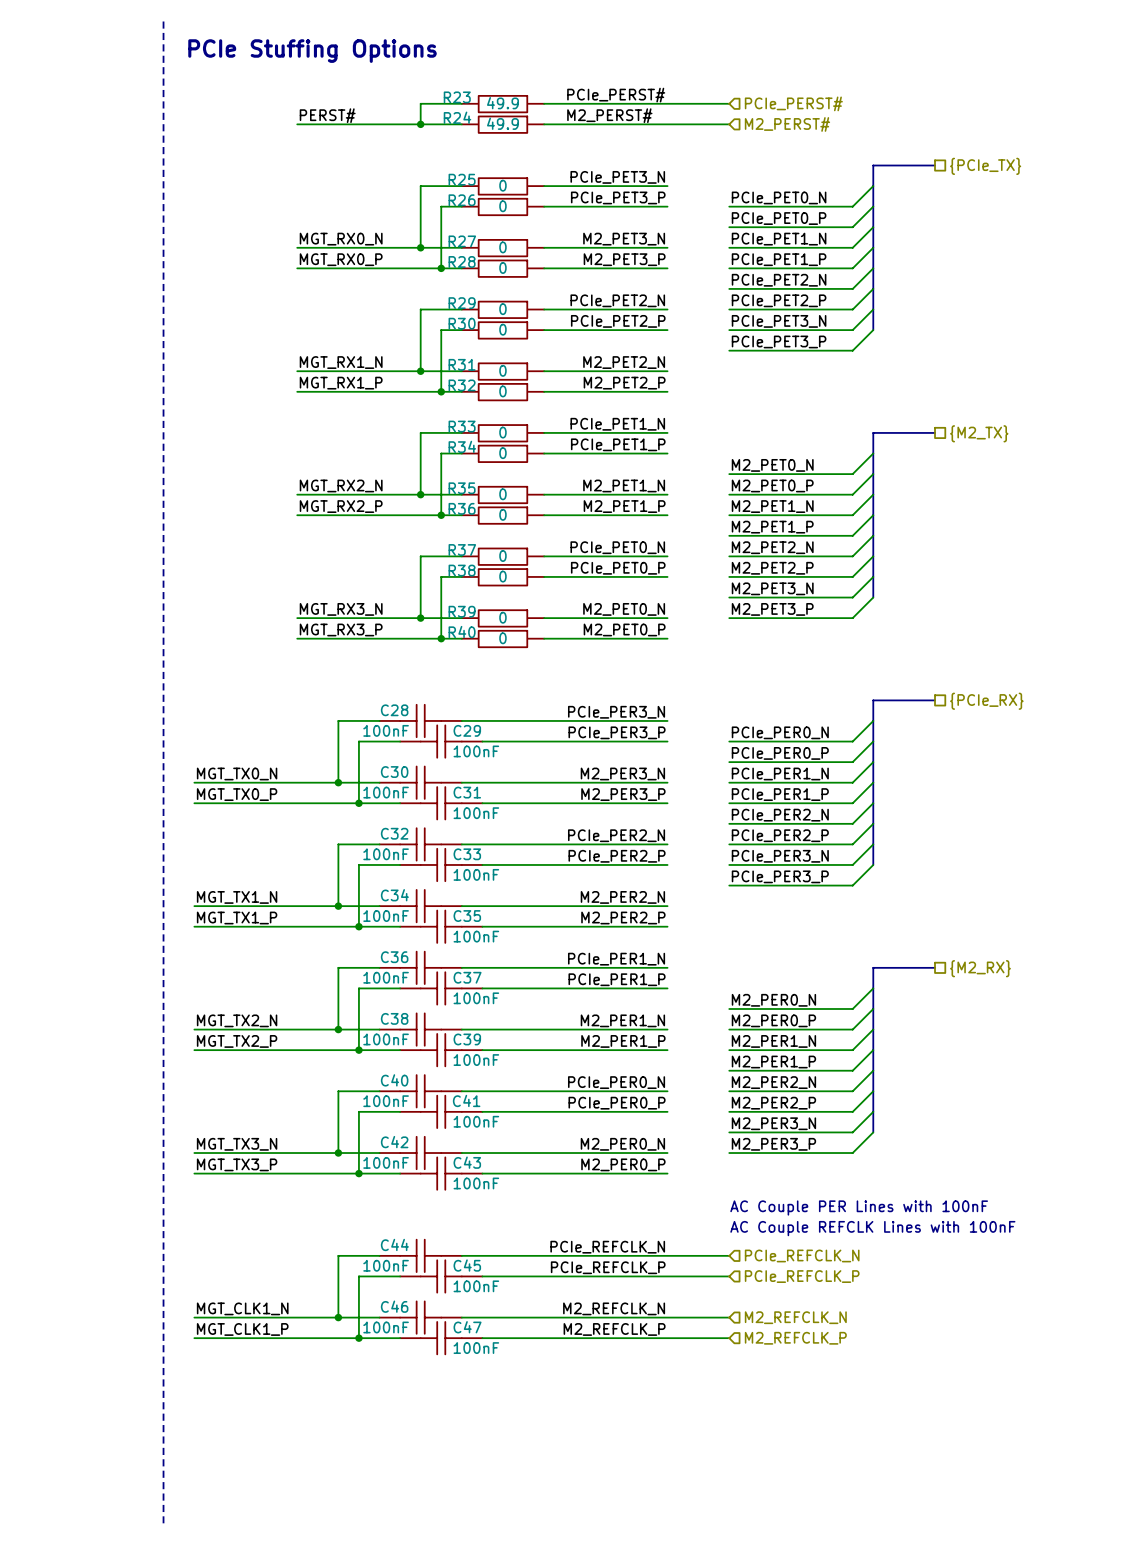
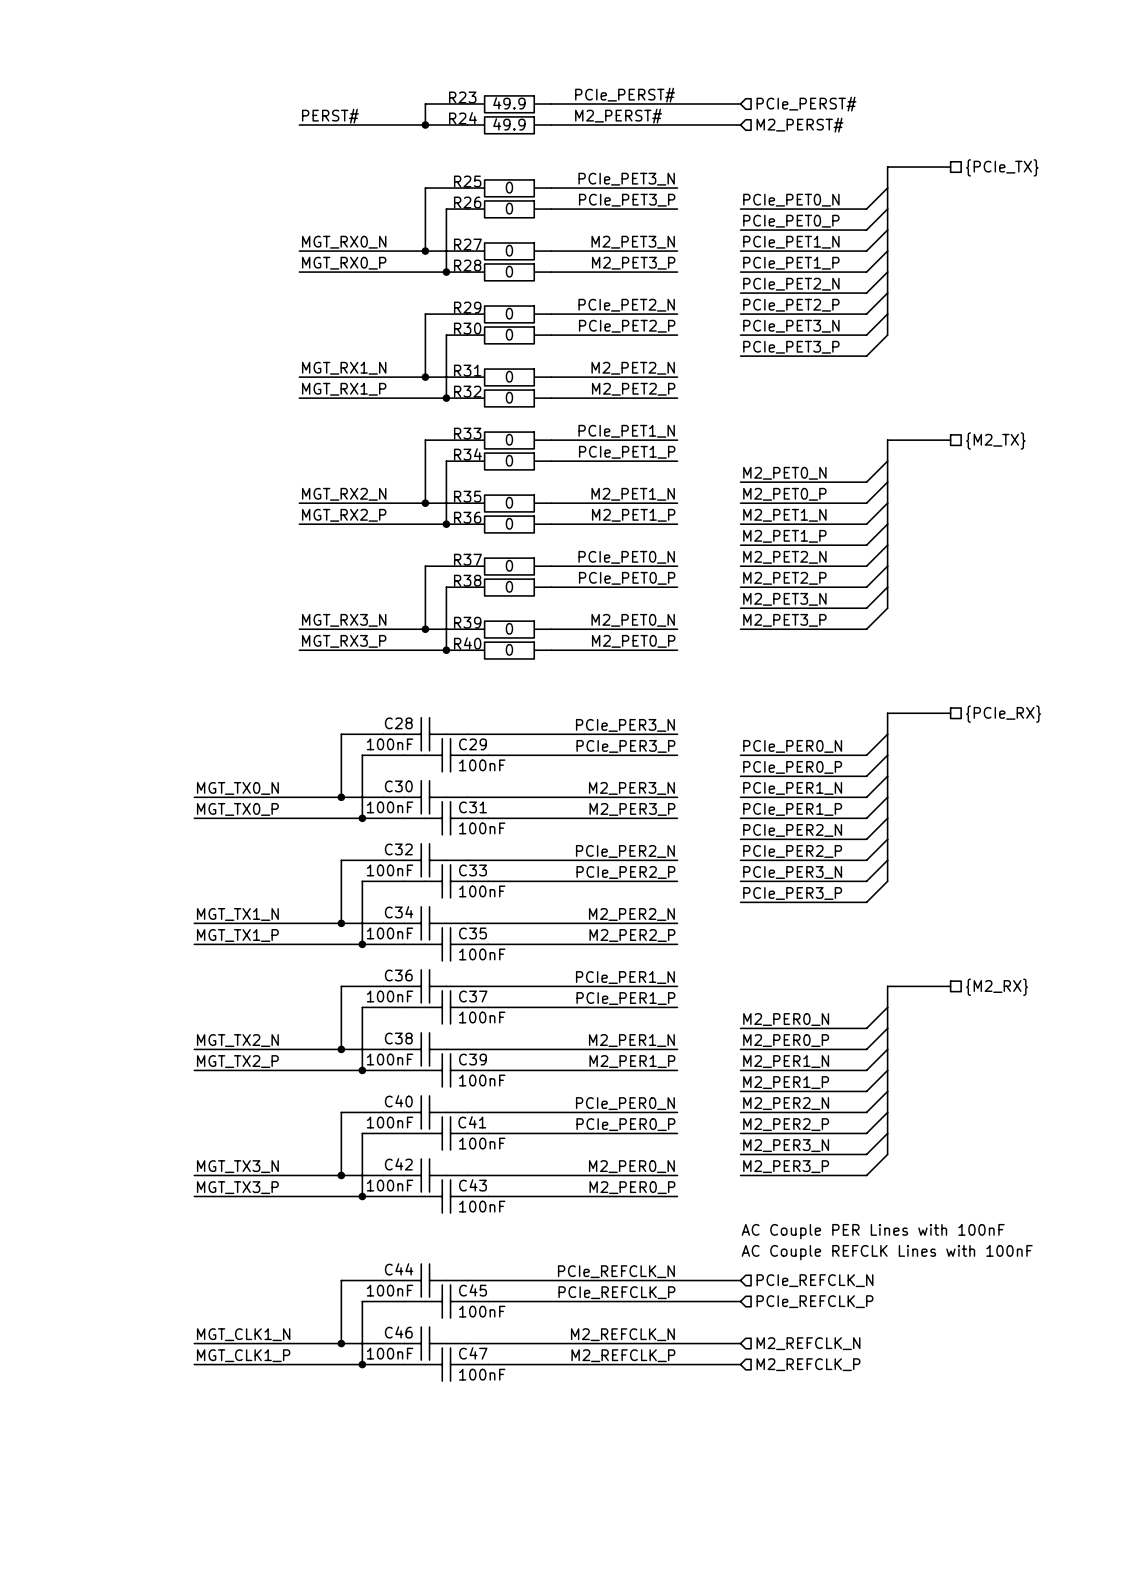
line: (163, 21) (163, 1523) -> none
text: PCIe Stuffing Options (312, 51) -> none

